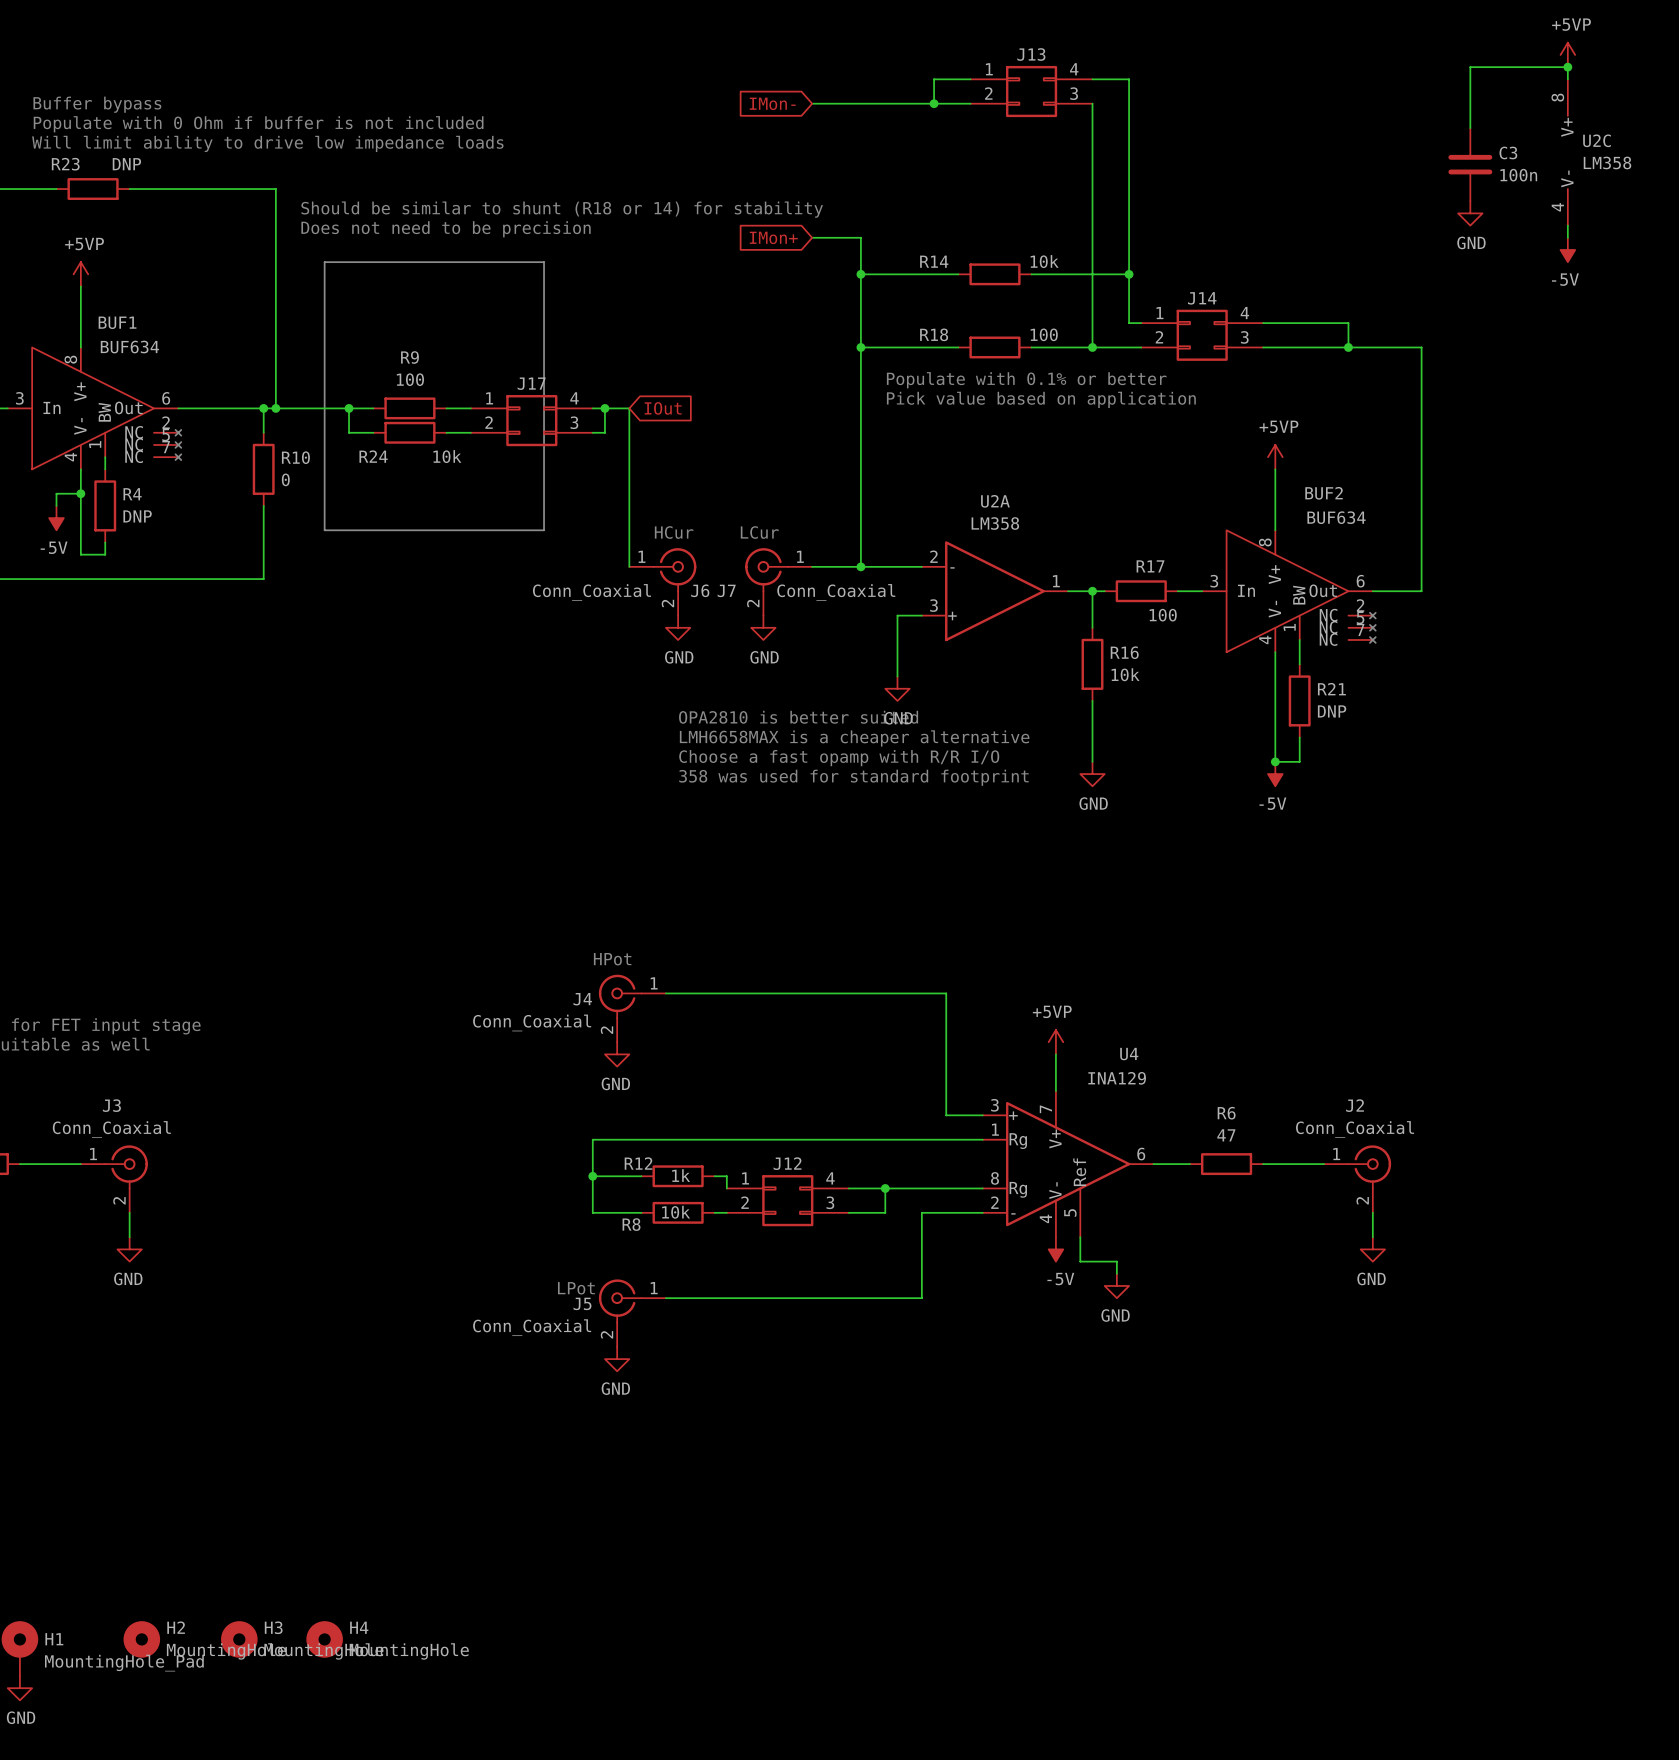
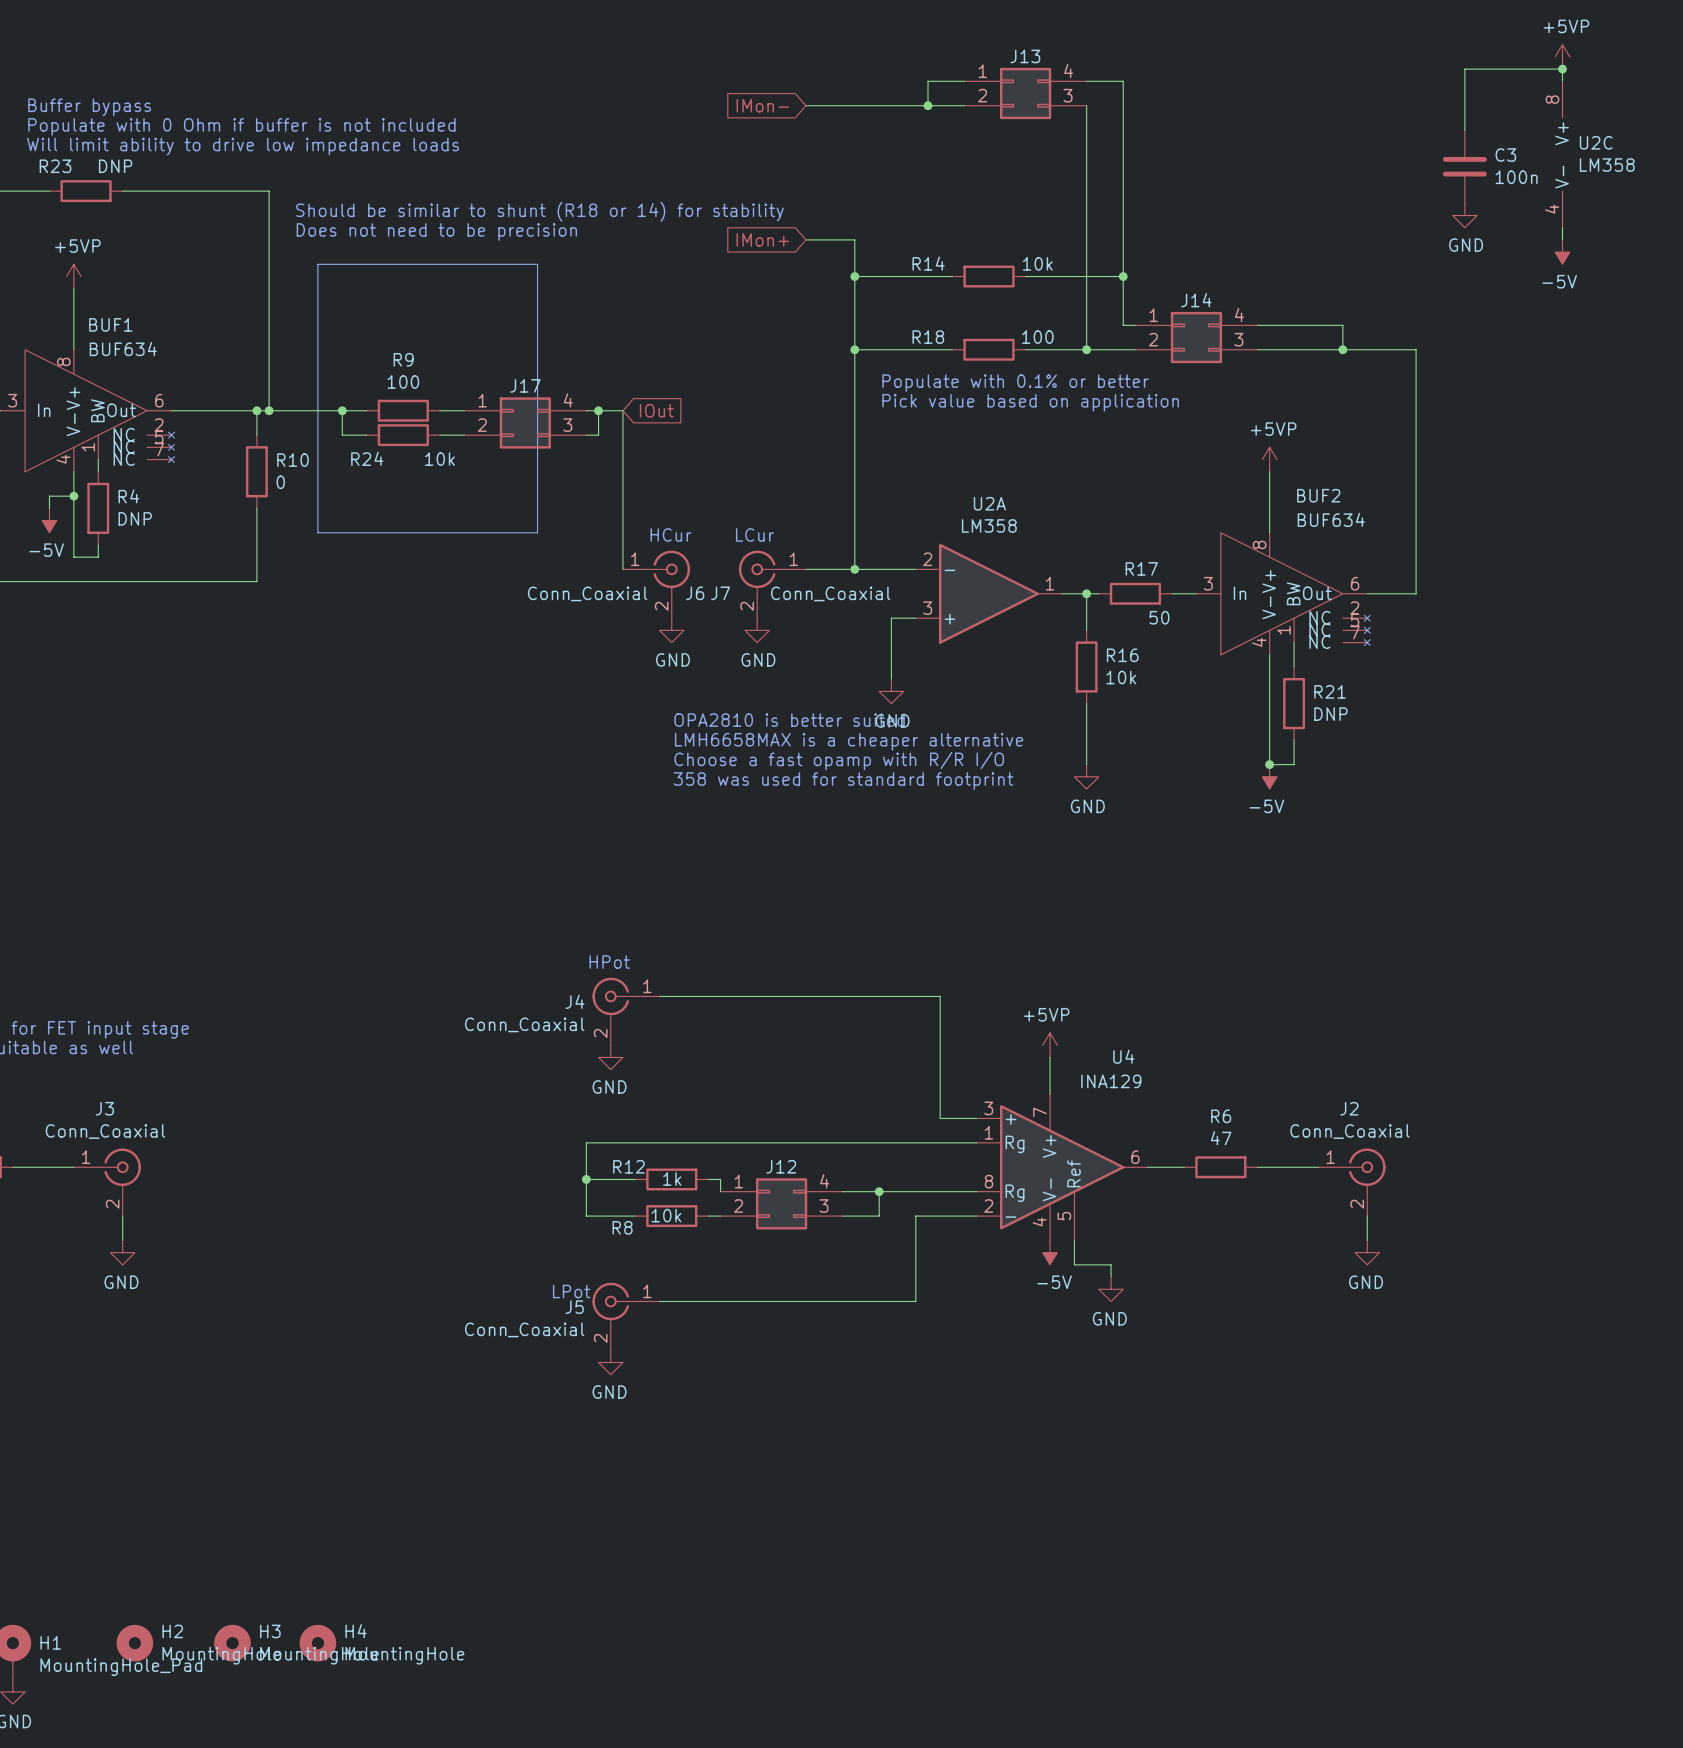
R17 value: 100 (1163, 615) -> 50 (1159, 617)

